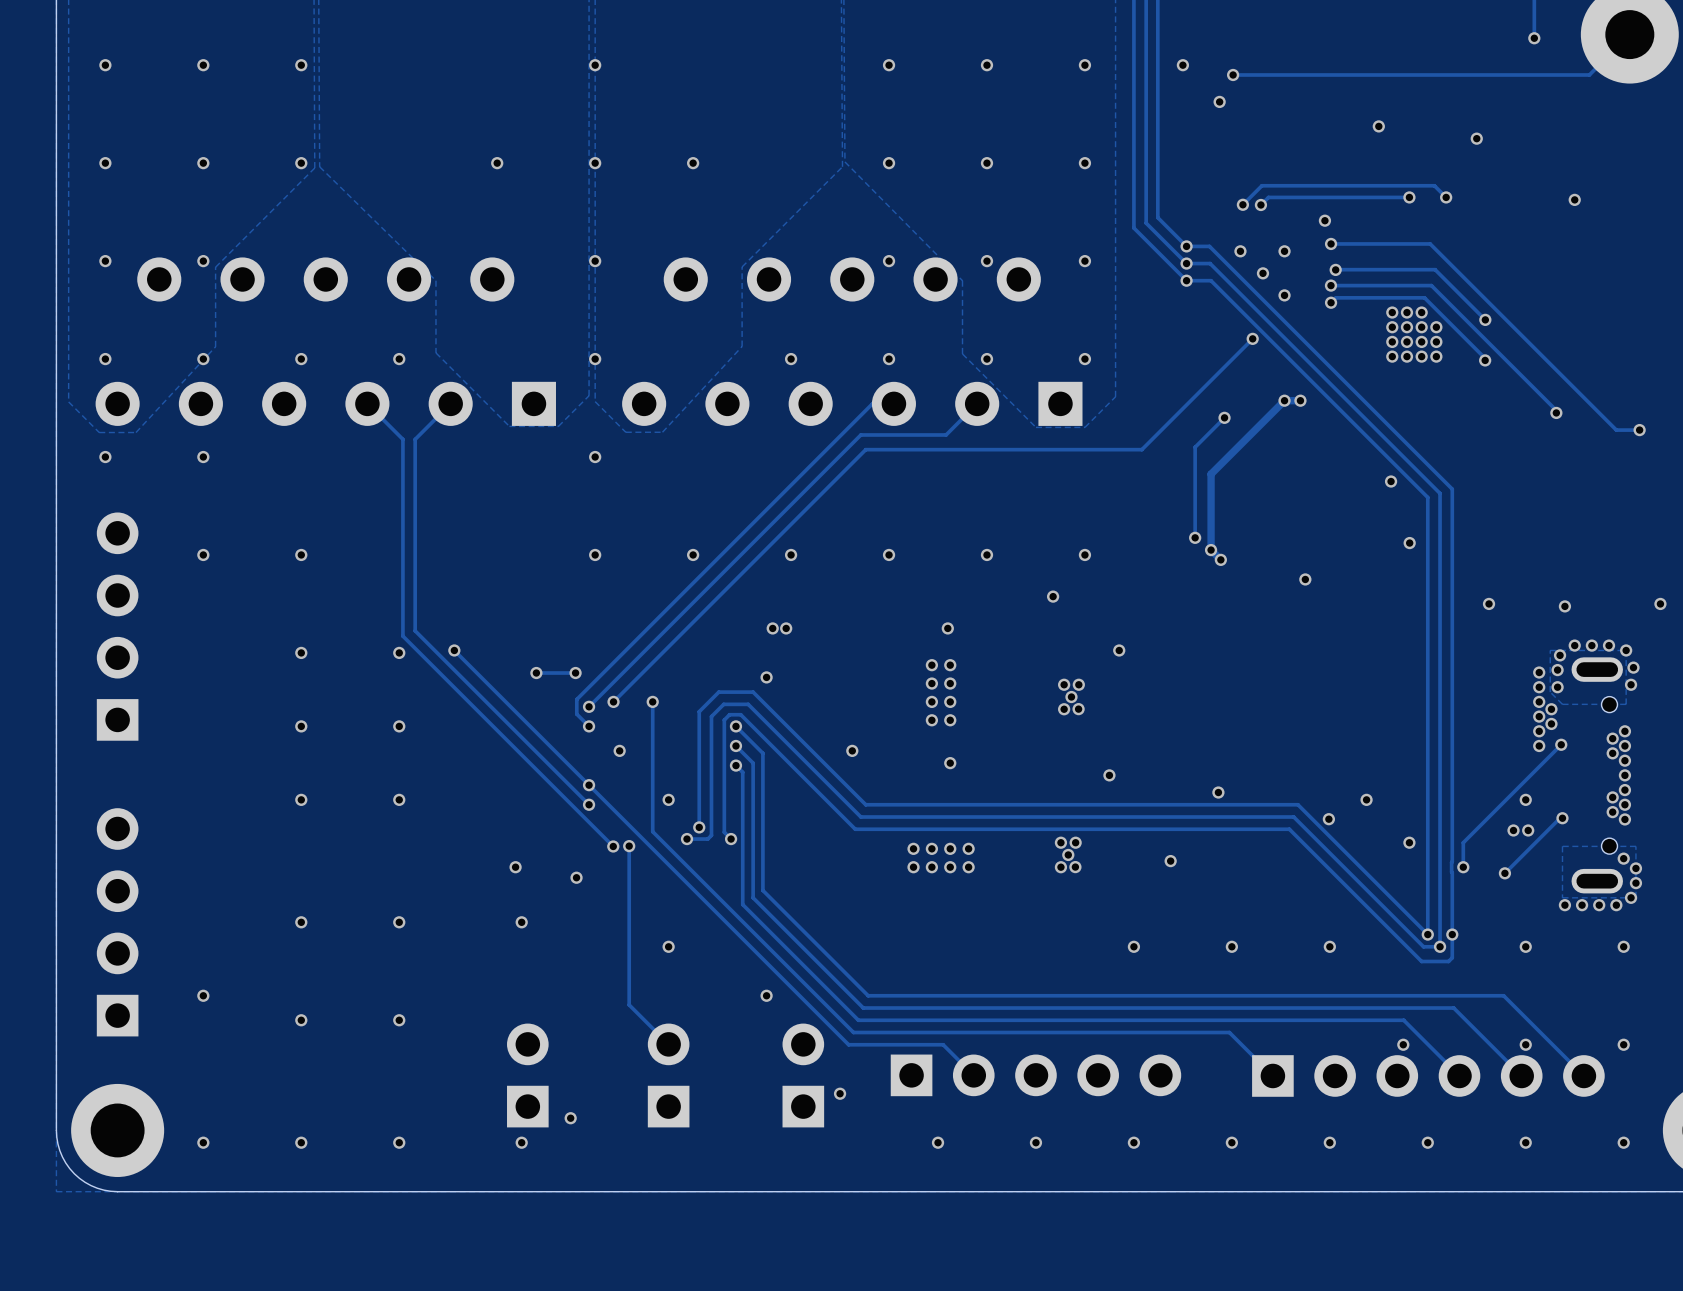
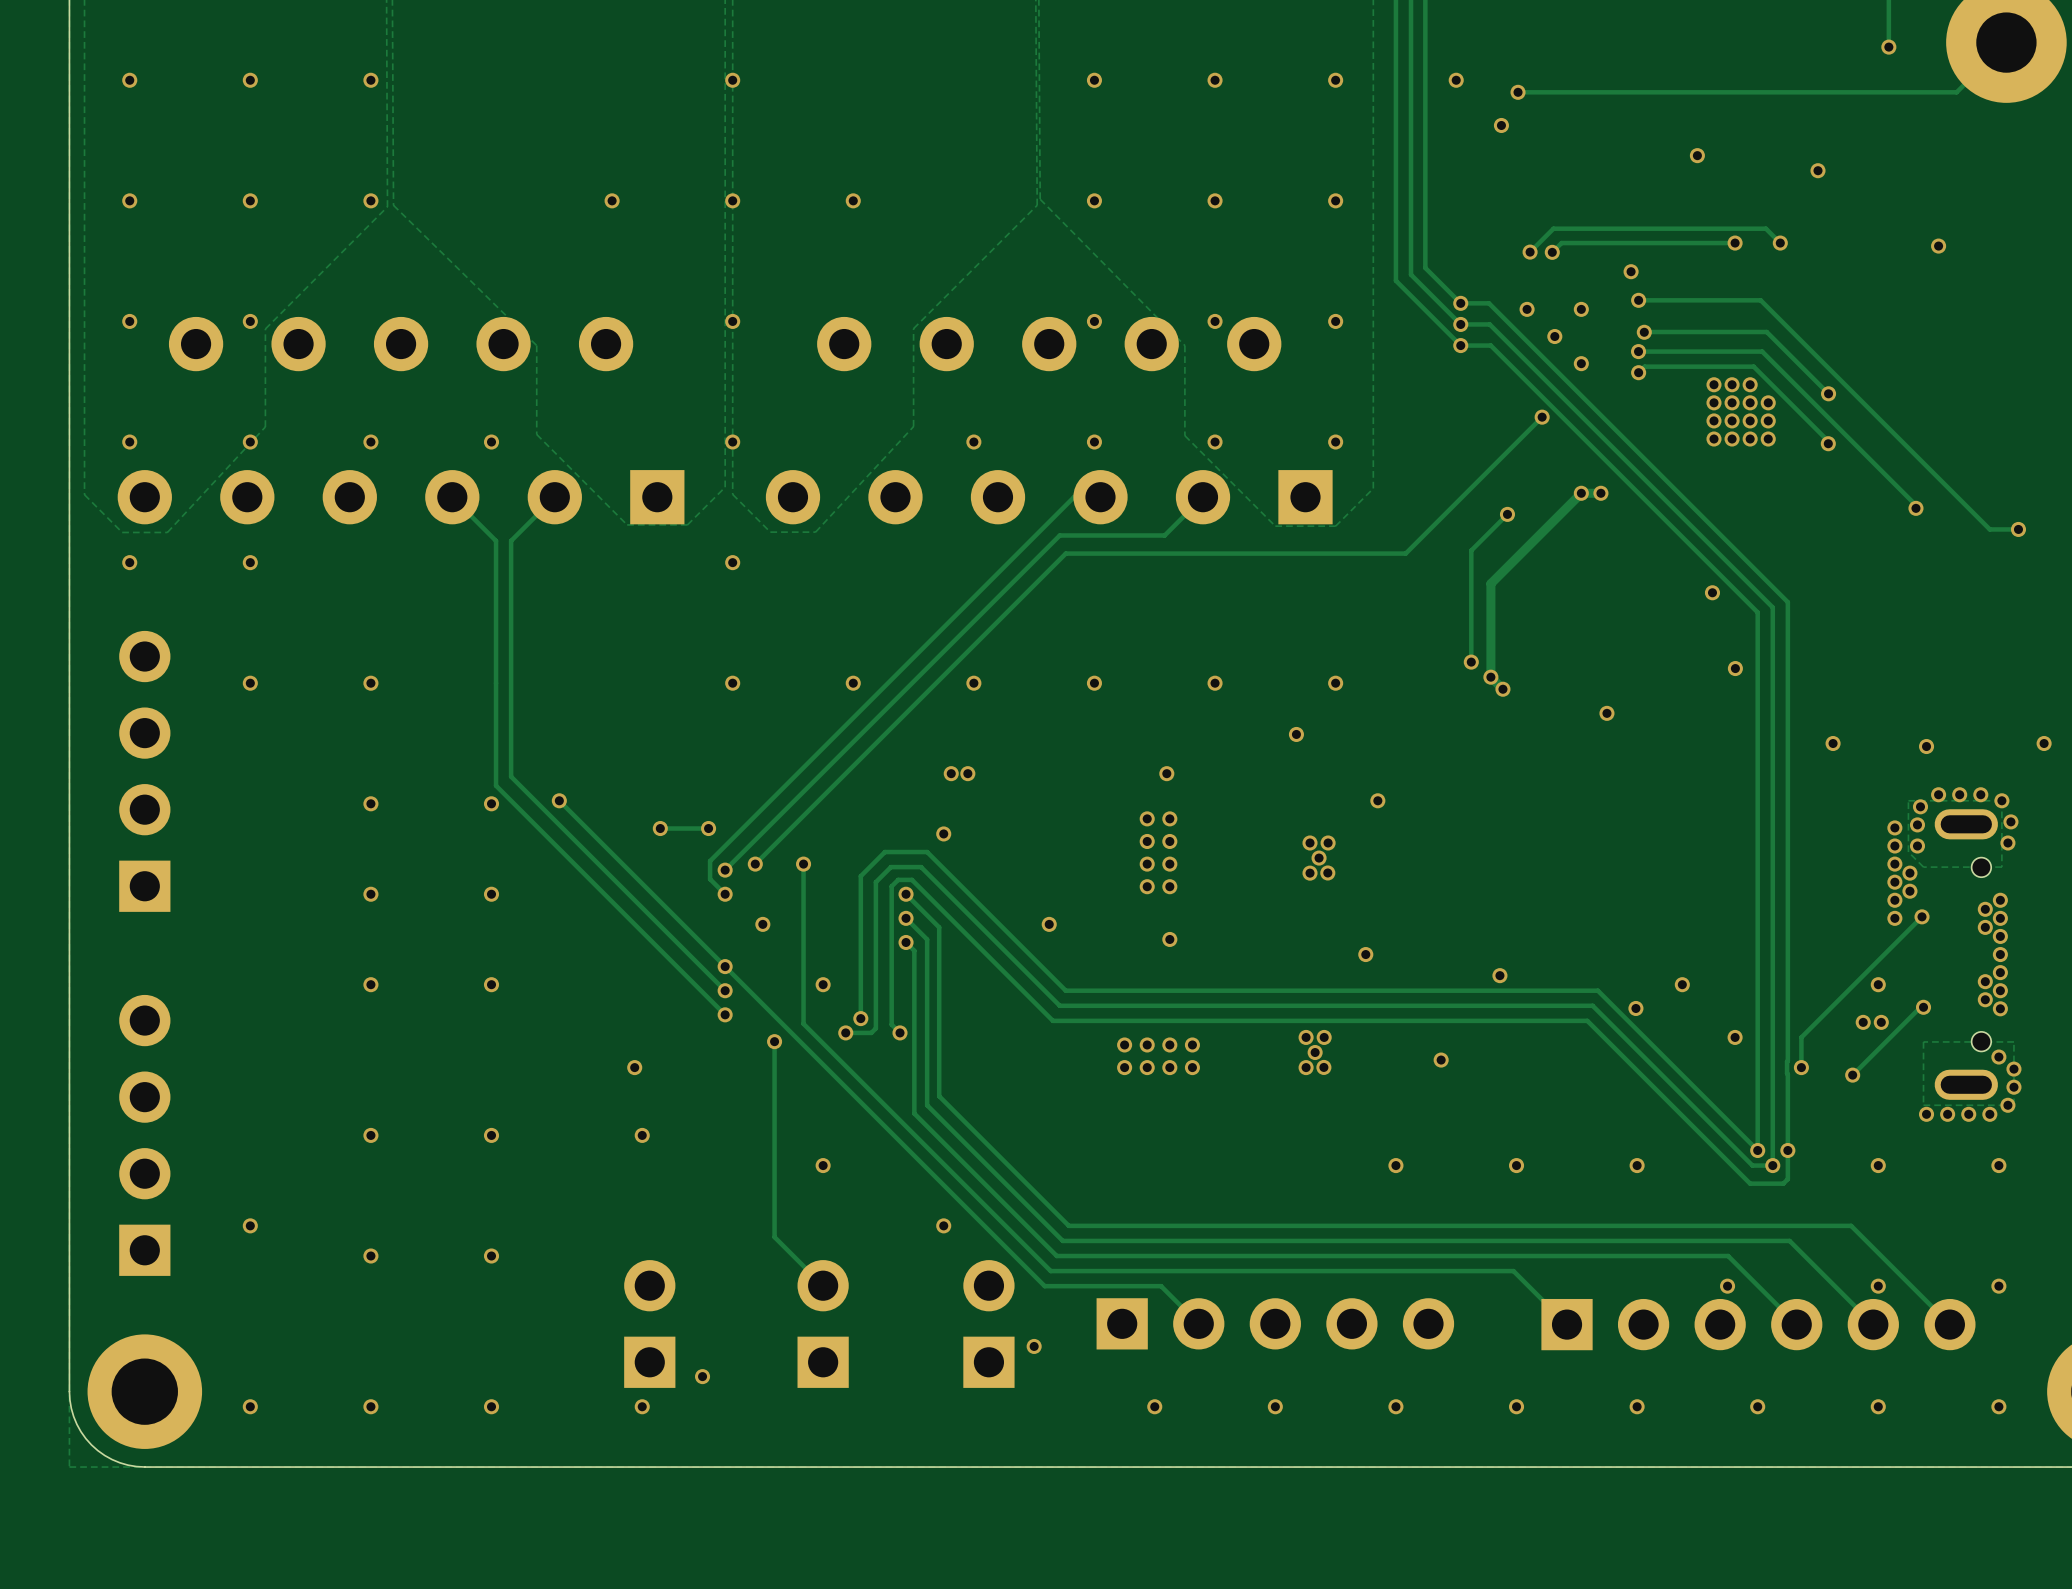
track: (402, 636) (613, 846) -> (496, 783) (496, 785) (725, 1014)
via: none -> (725, 1014)
via: (613, 846) -> none
via: (576, 877) -> none

